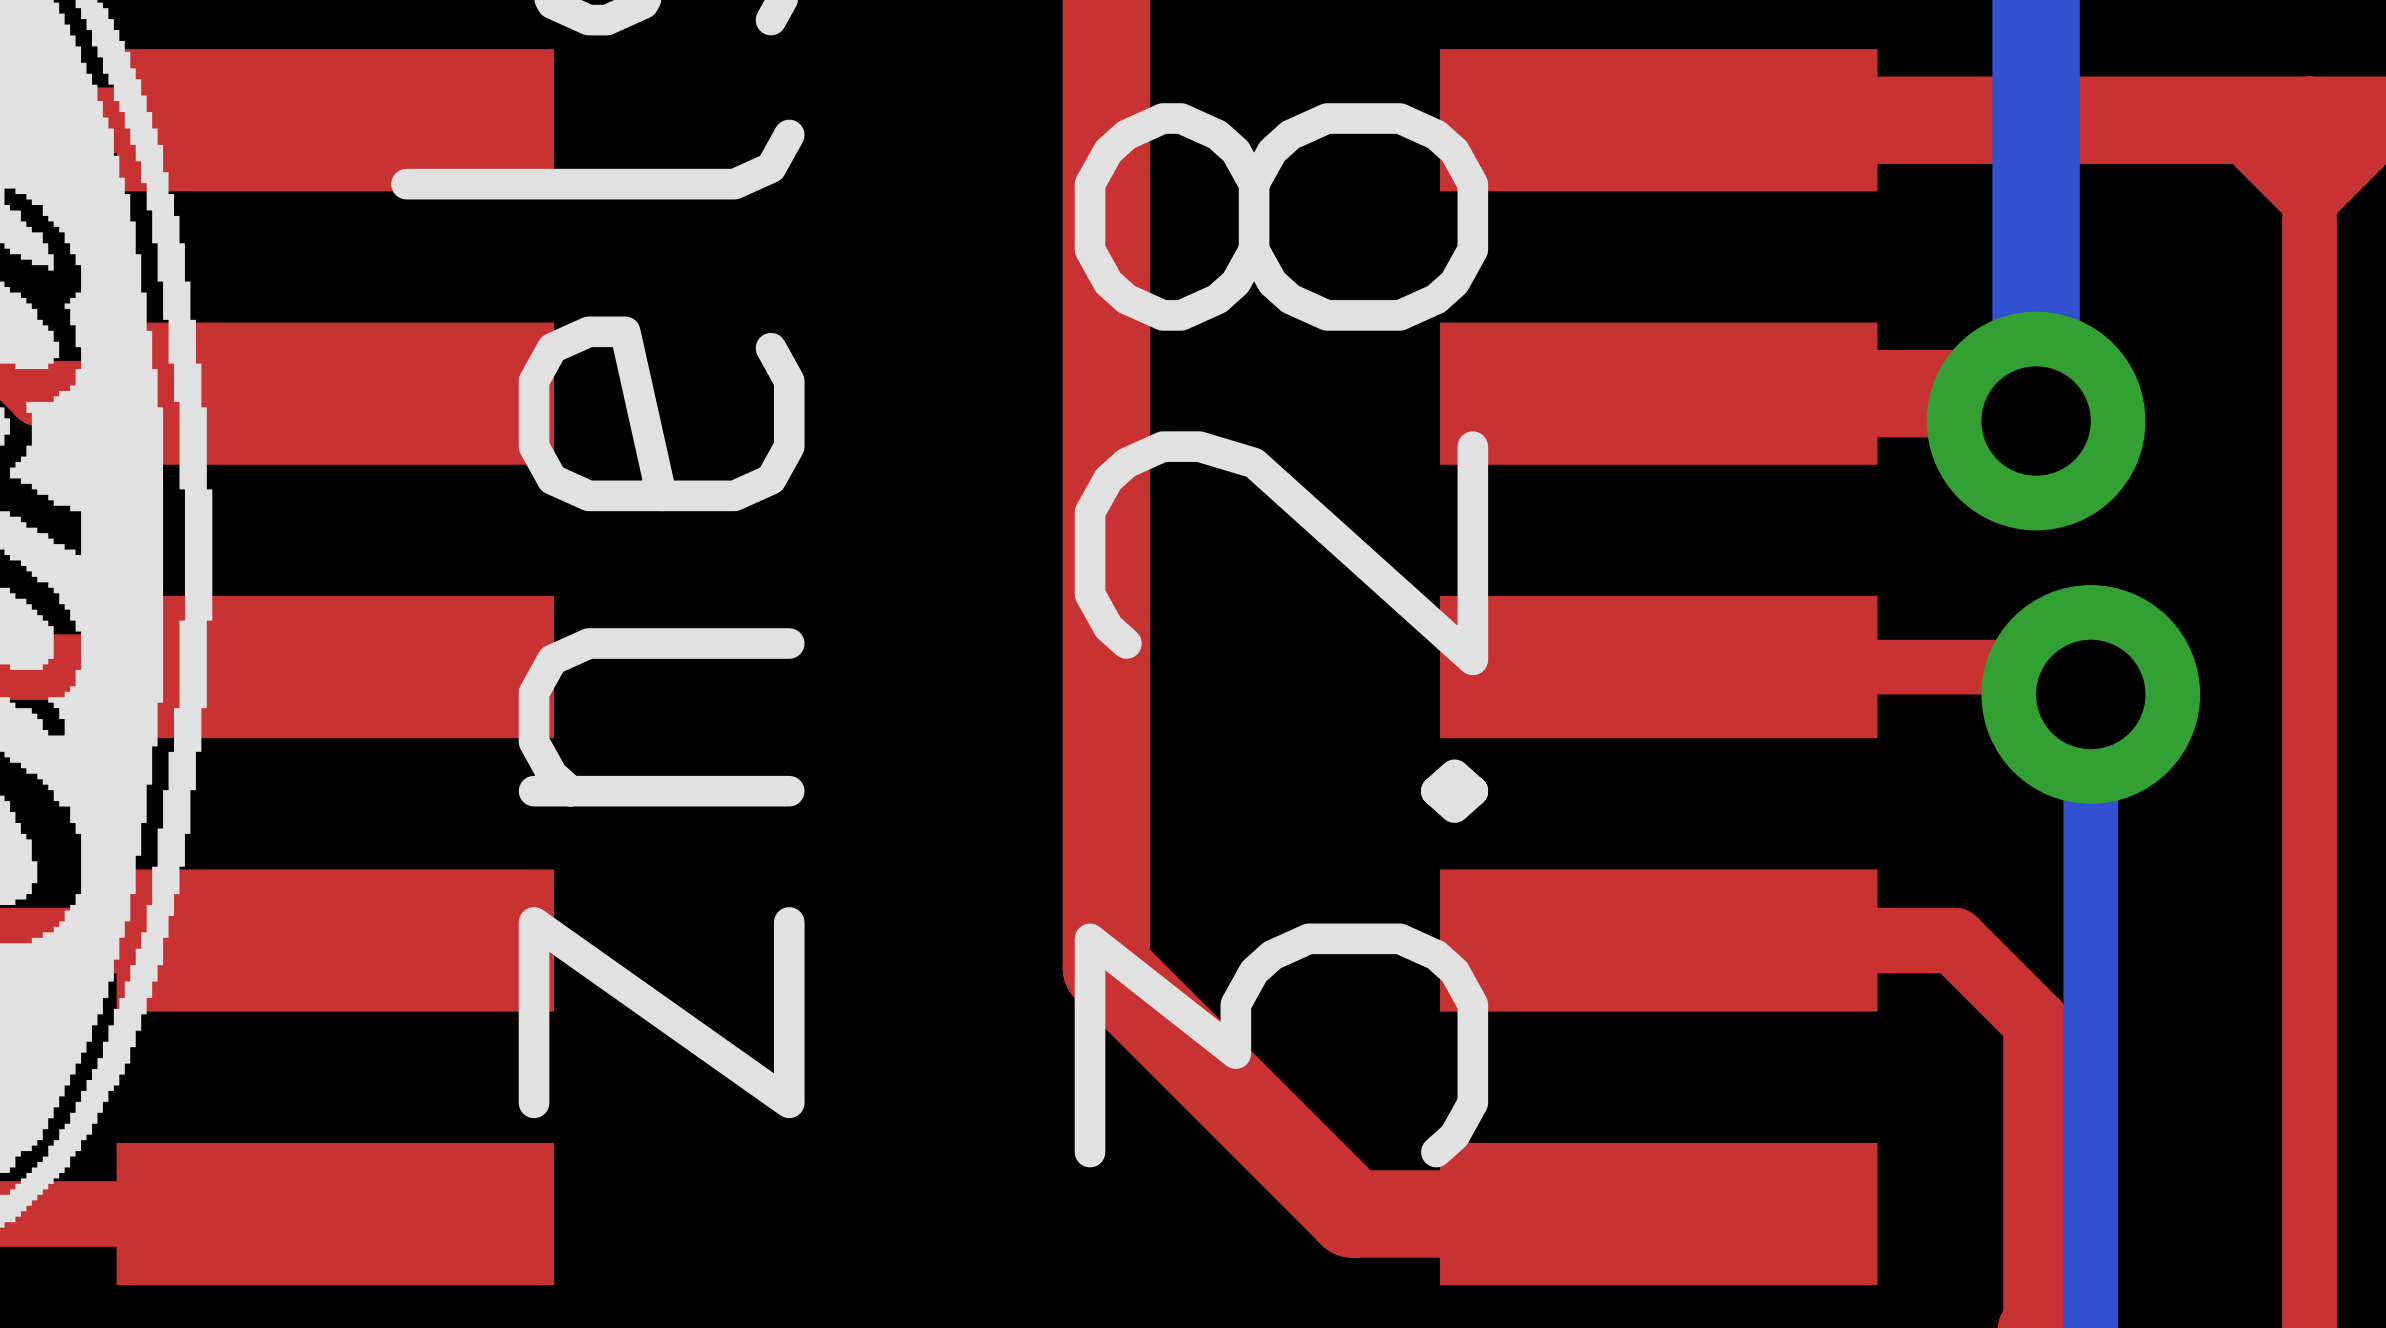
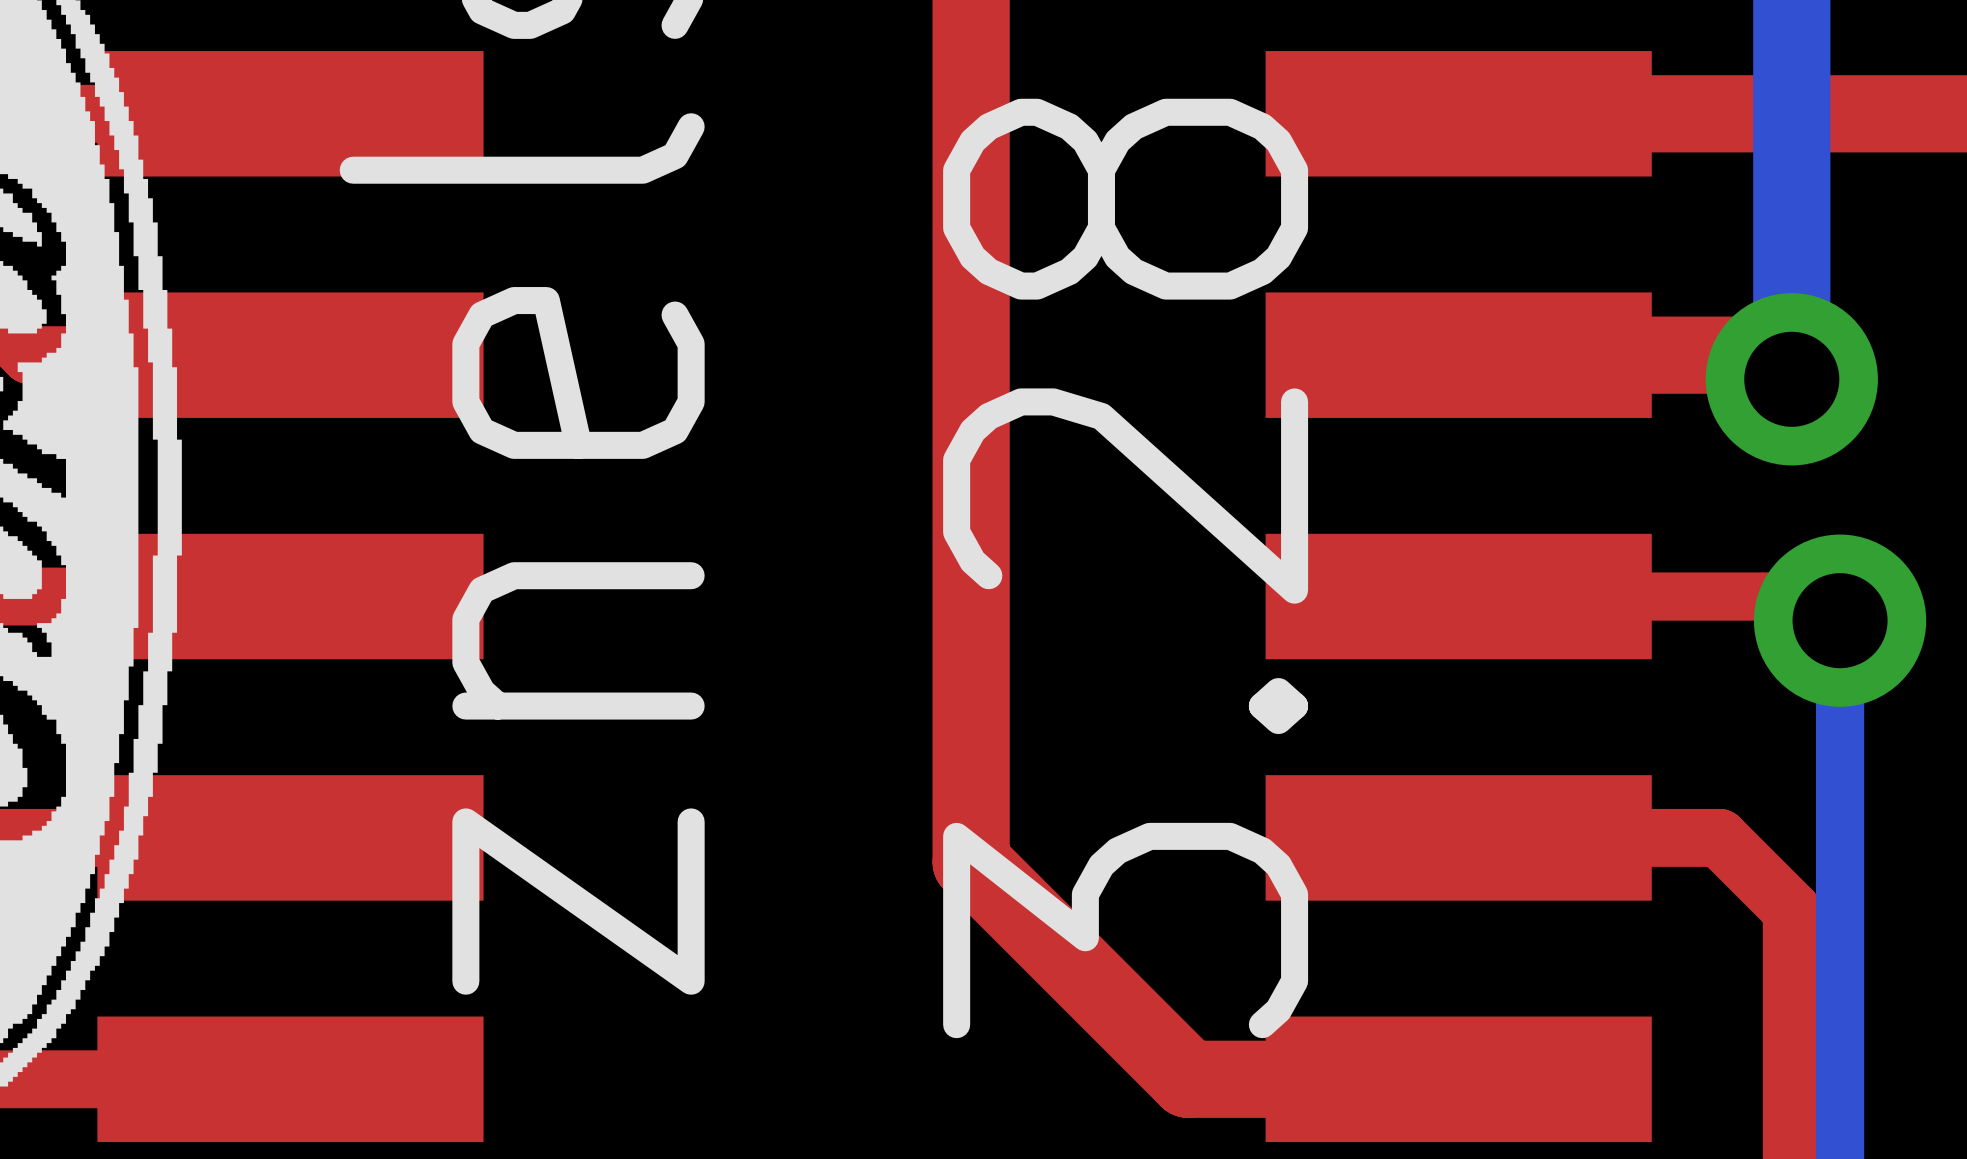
via size: [1926, 311, 2146, 531] -> [1705, 293, 1878, 466]
via size: [1981, 585, 2201, 804] -> [1753, 534, 1927, 707]

